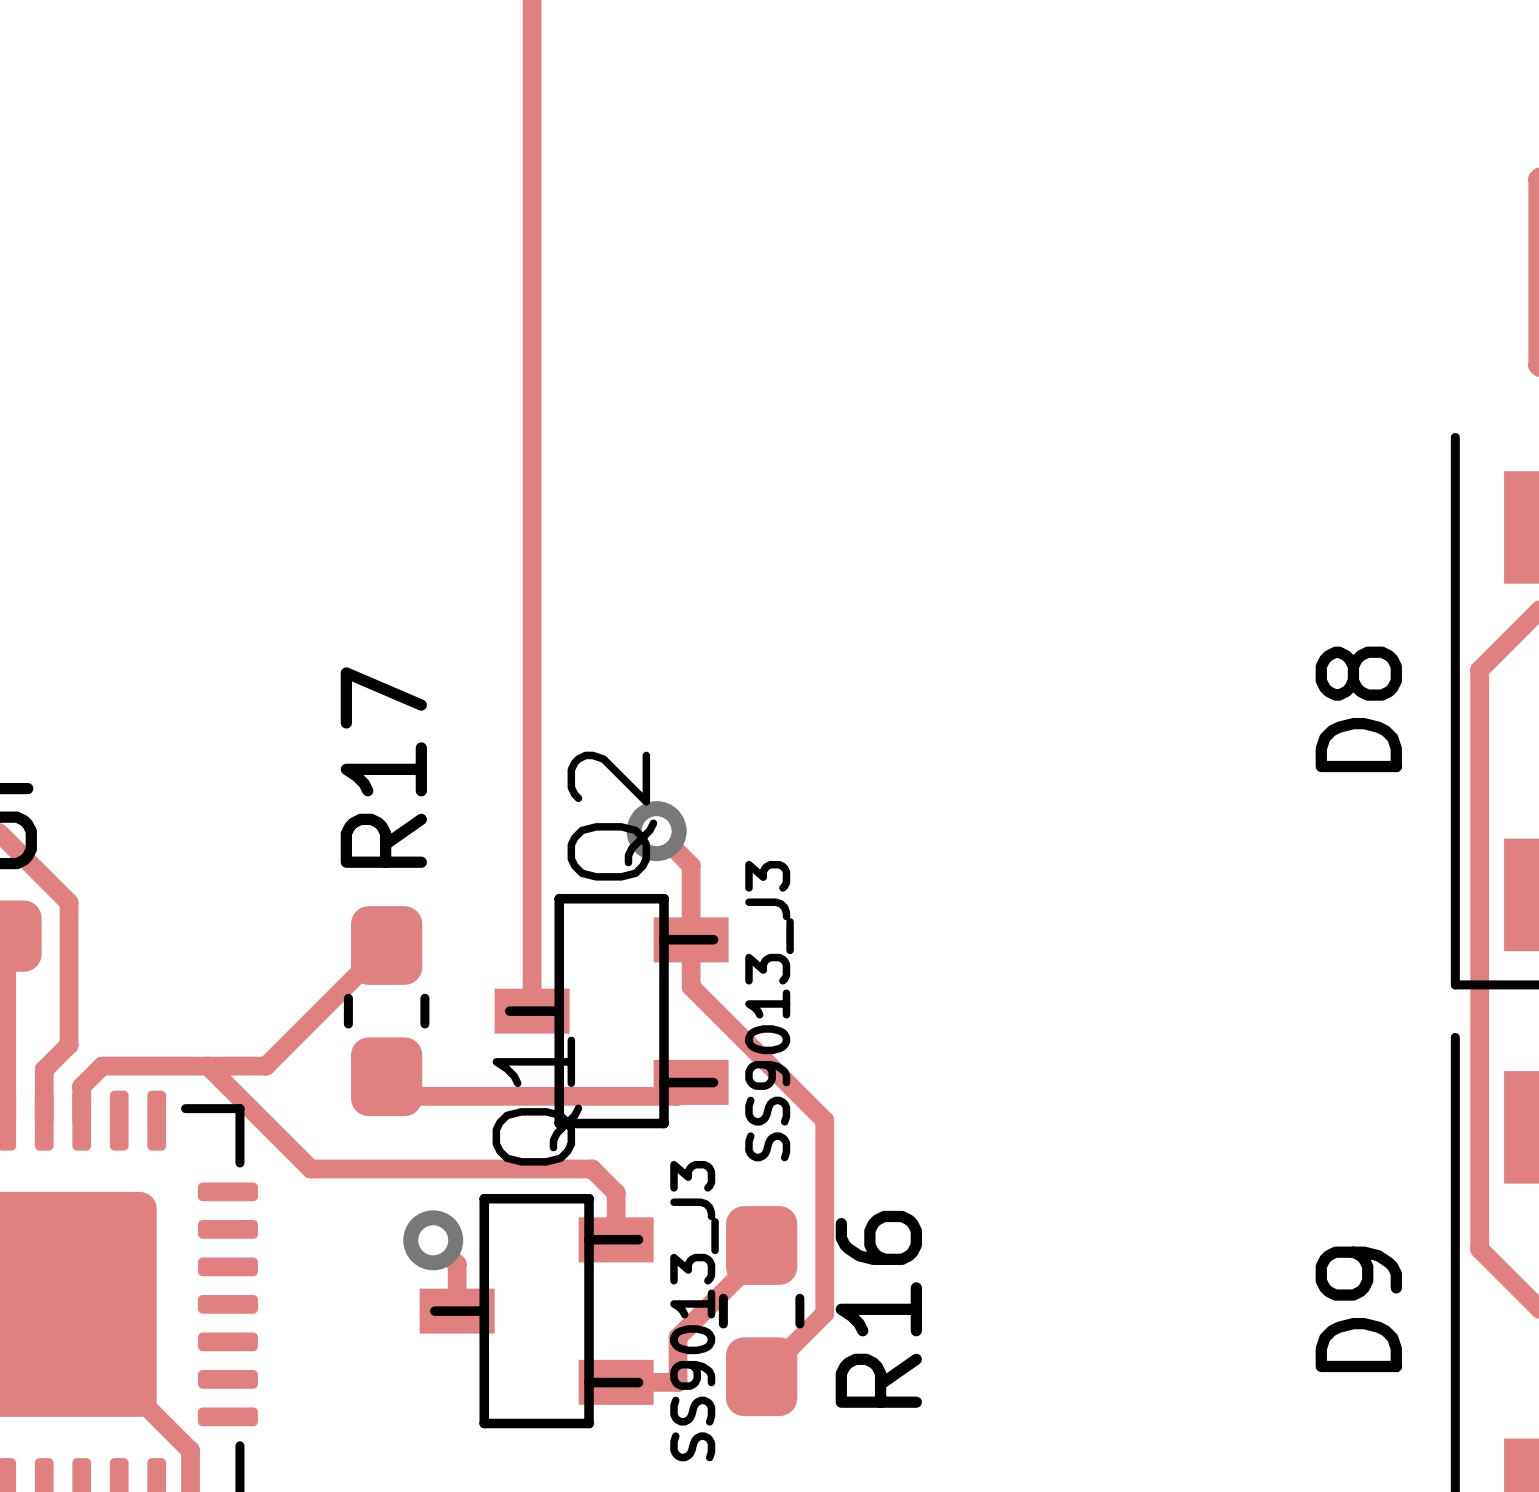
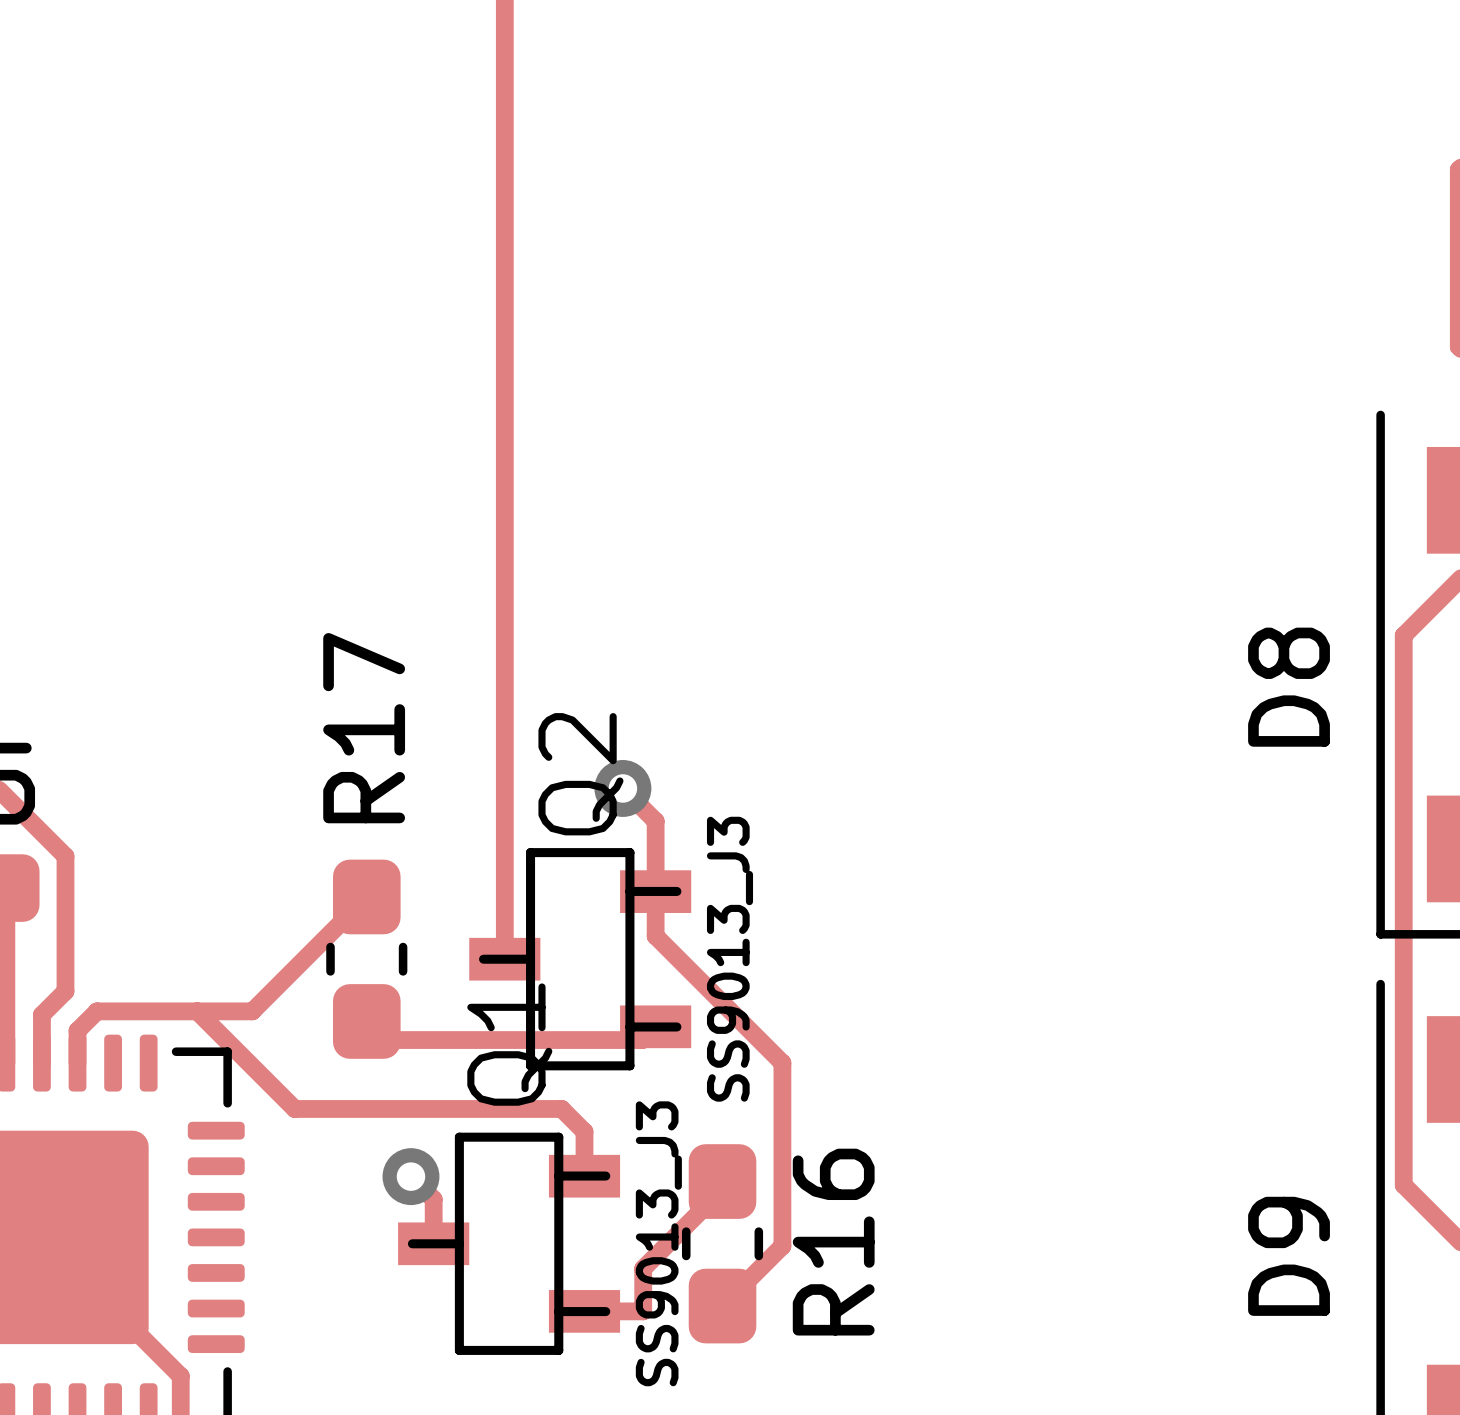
D8 name position: D8 (1358, 709) -> D8 (1289, 687)
D9 name position: D9 (1358, 1309) -> D9 (1289, 1256)

